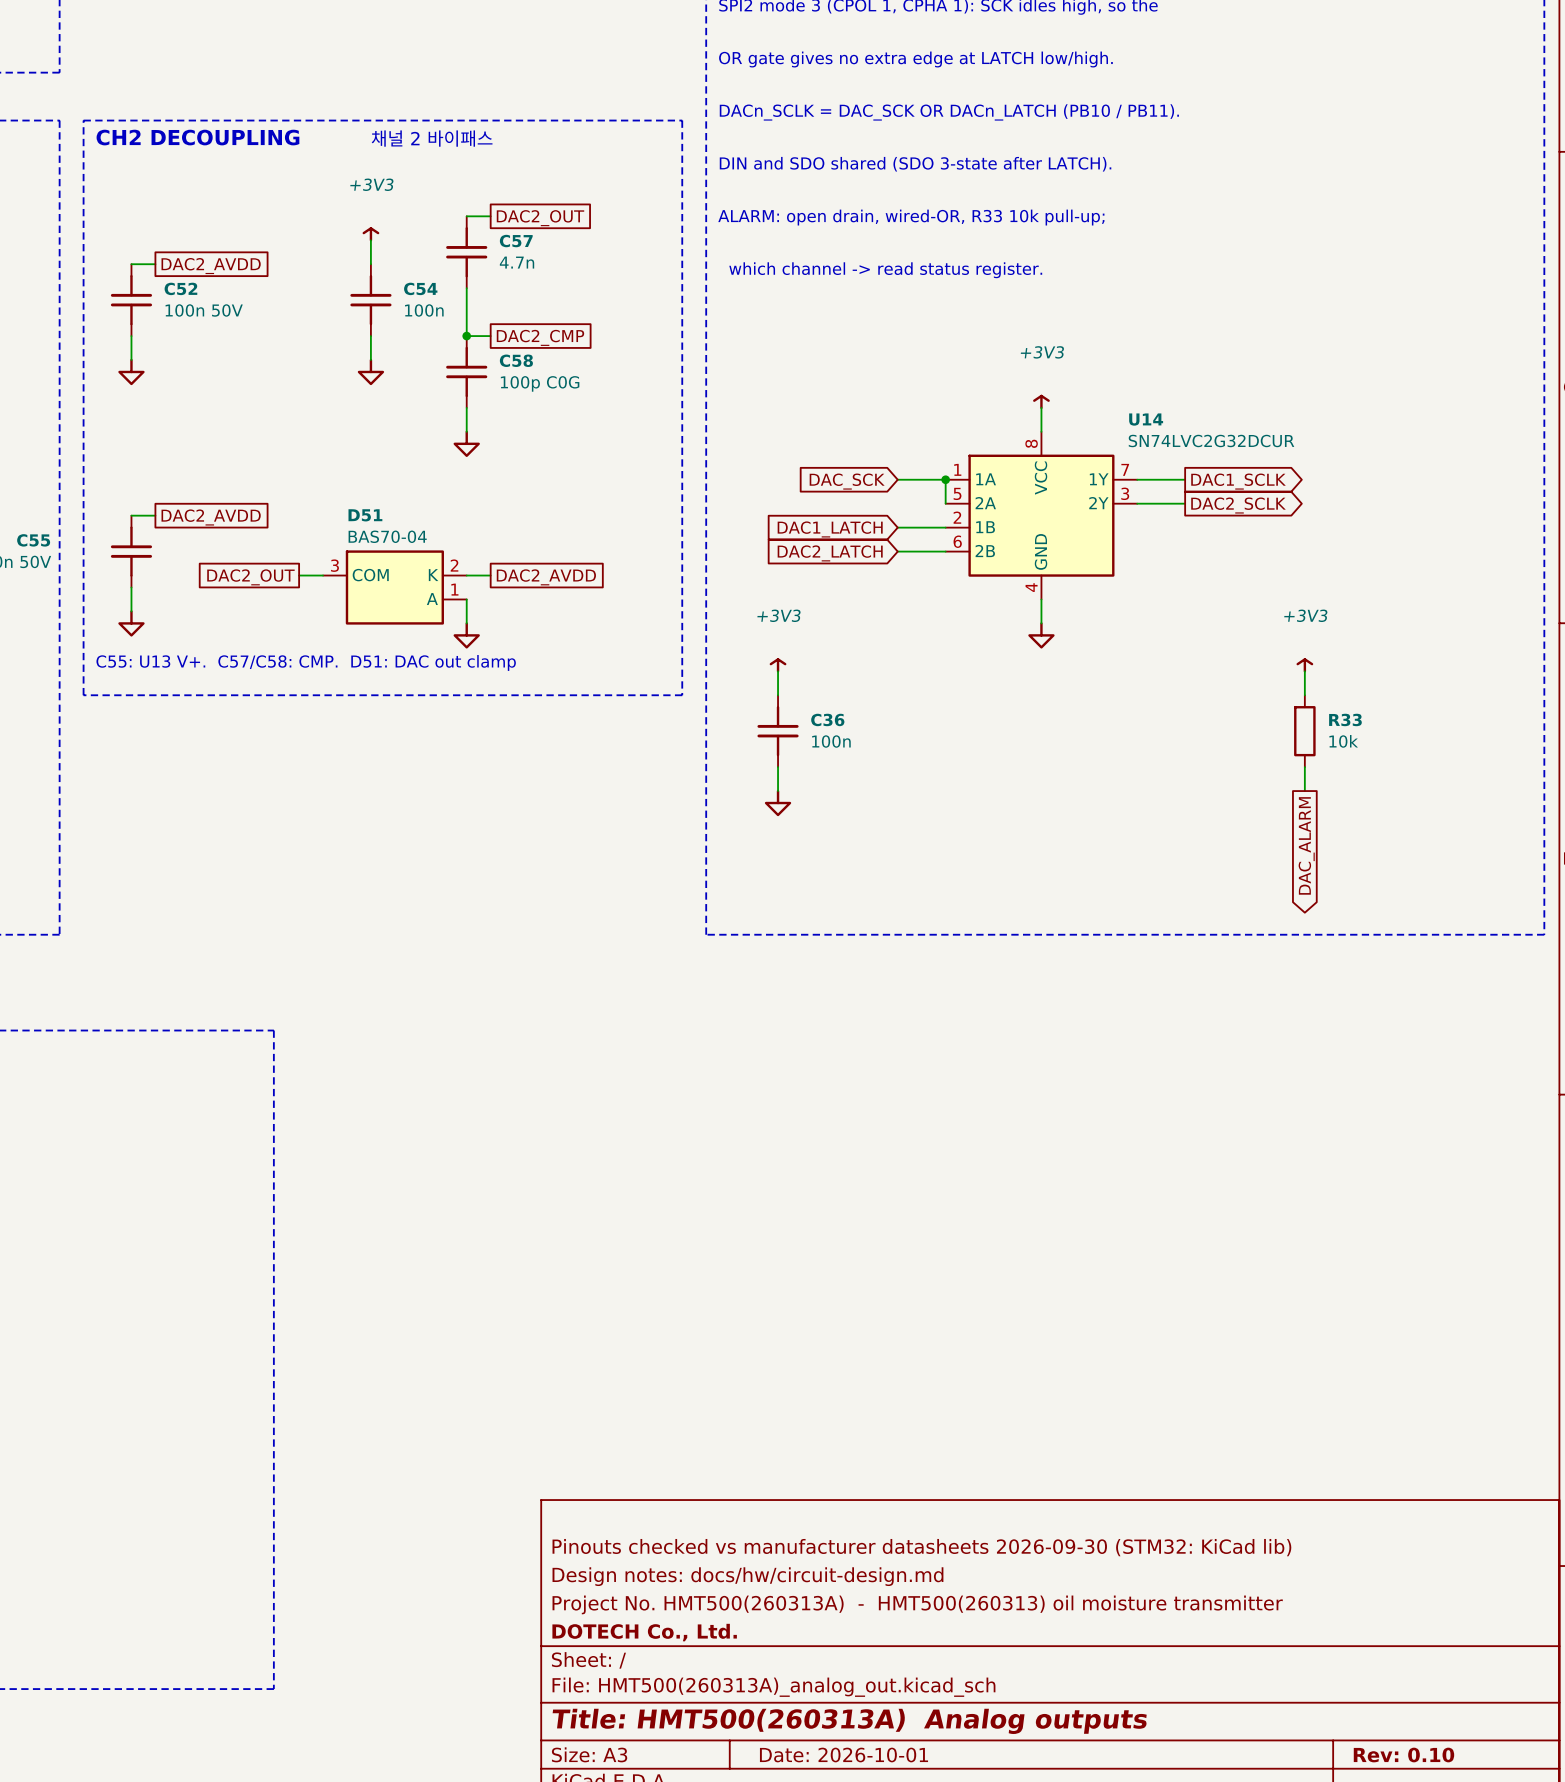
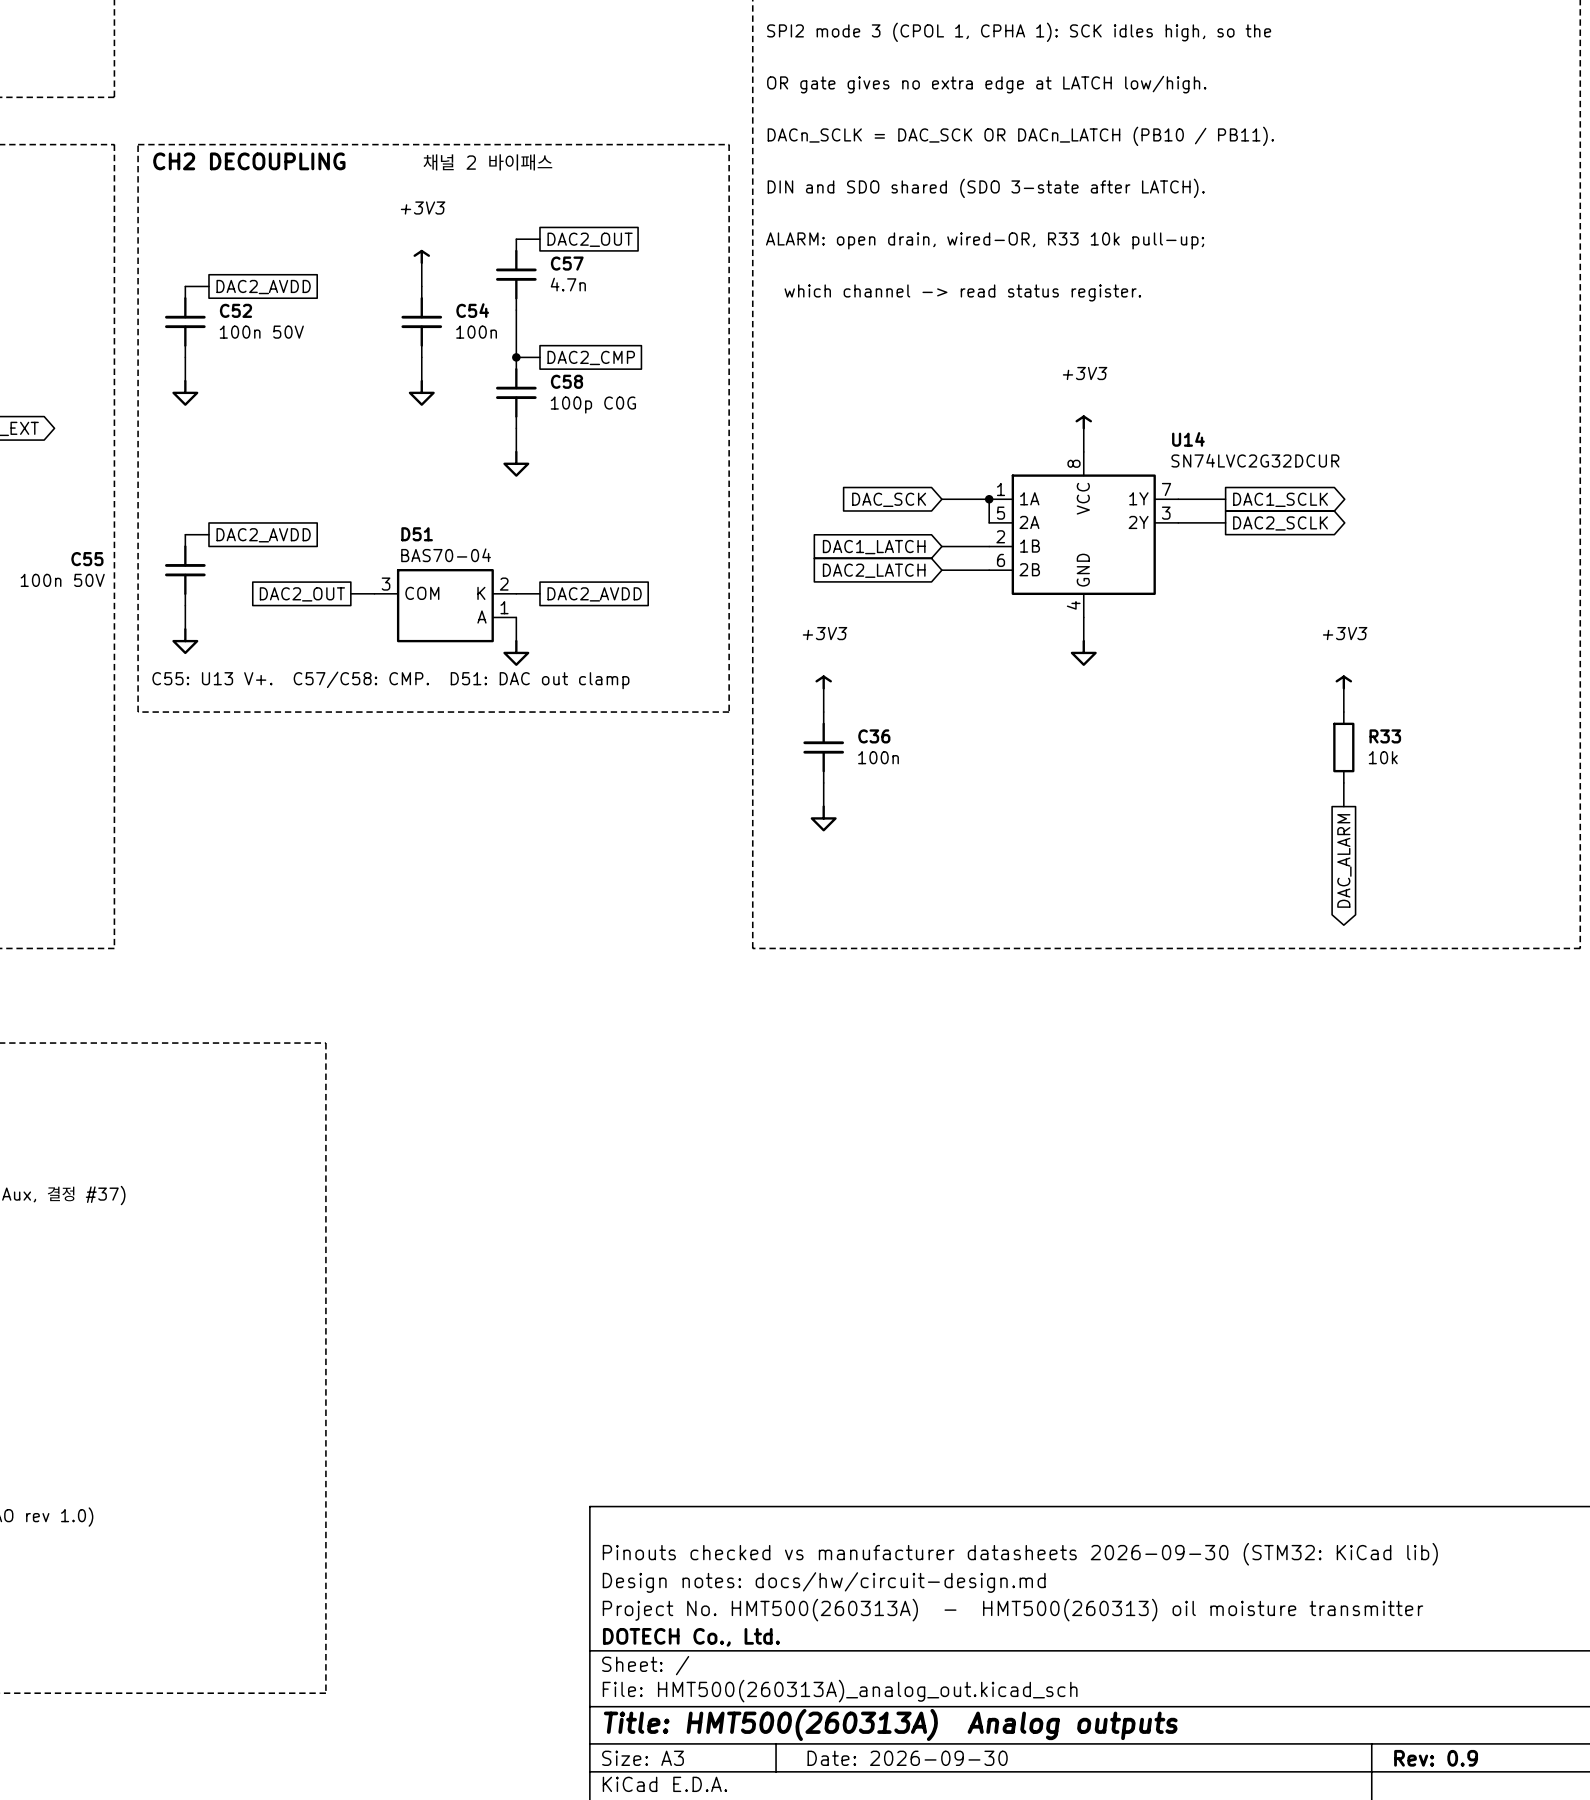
title block: Date: 2026-10-01 (843, 1755) -> Date: 2026-09-30 (907, 1758)
title block: Rev: 0.10 (1403, 1755) -> Rev: 0.9 (1436, 1758)

